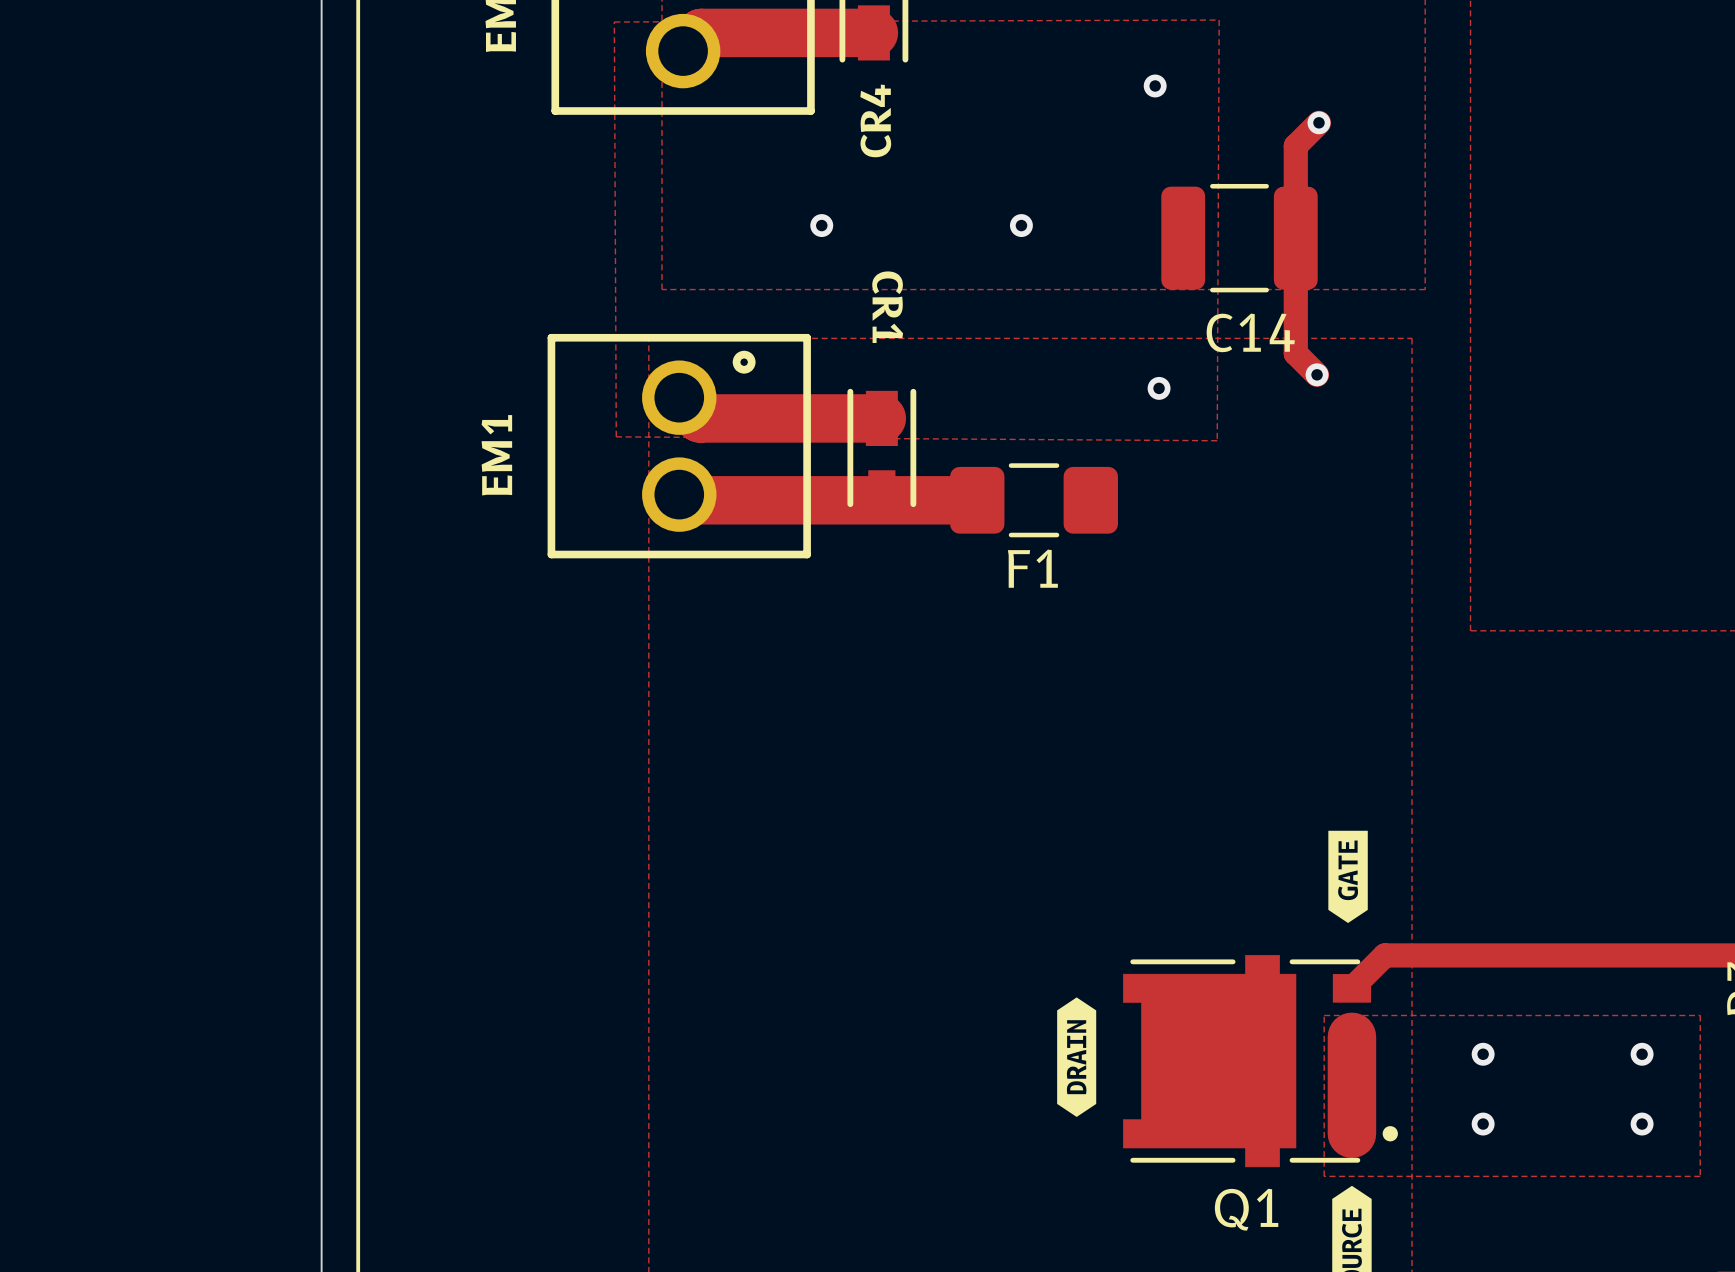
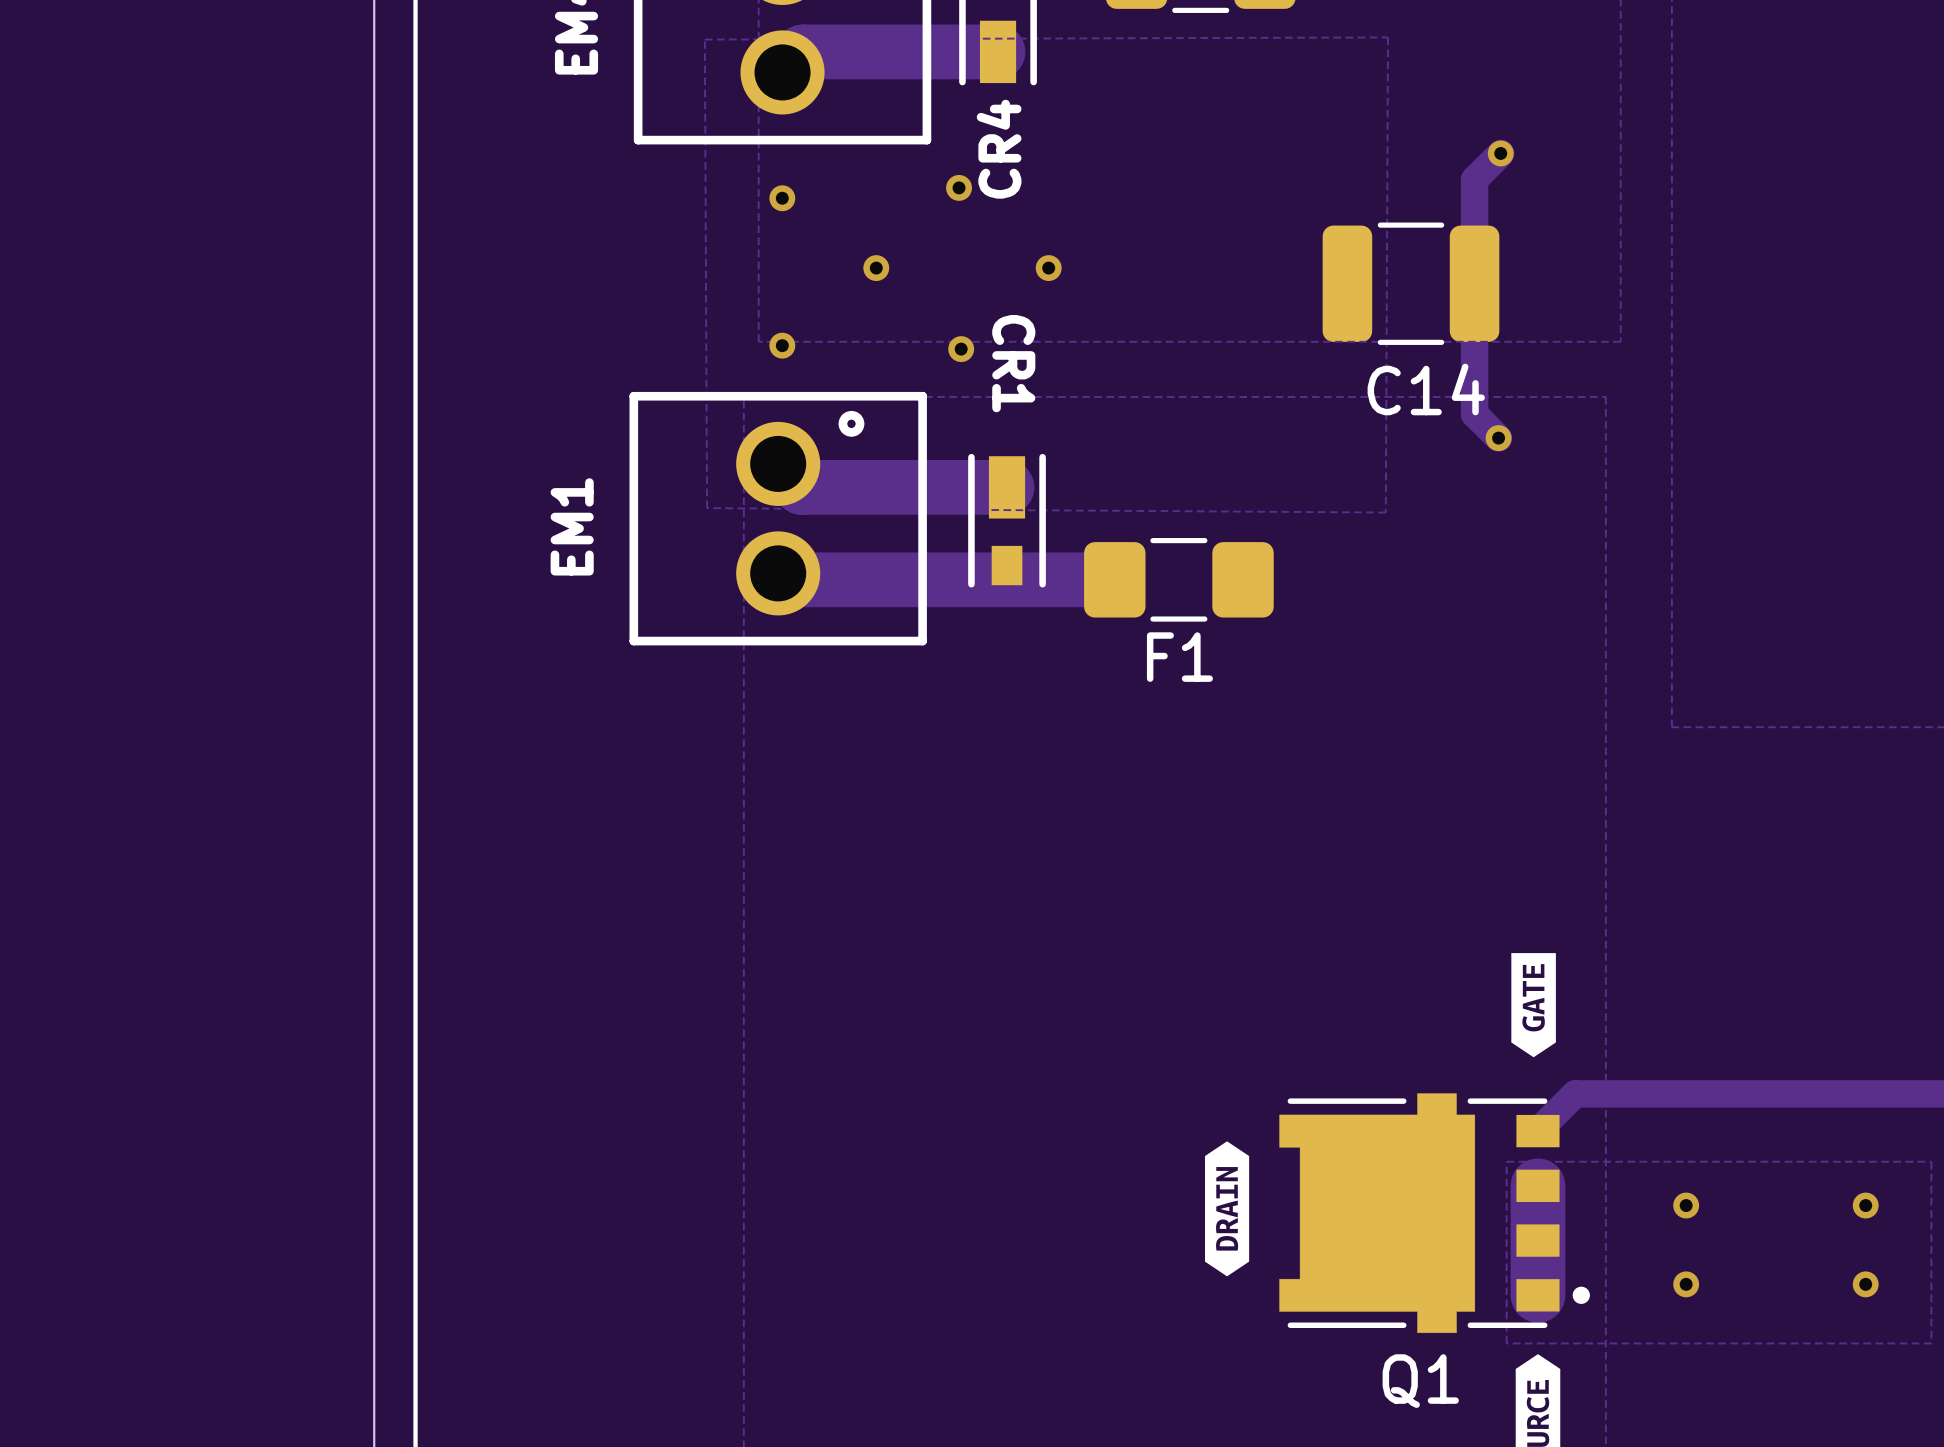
via: (1155, 85) -> none
via: none -> (959, 187)
via: none -> (782, 198)
via: none -> (876, 268)
via: none -> (1048, 268)
via: (821, 225) -> none
via: (1021, 225) -> none
via: none -> (782, 345)
via: none -> (961, 349)
via: (1159, 388) -> none

